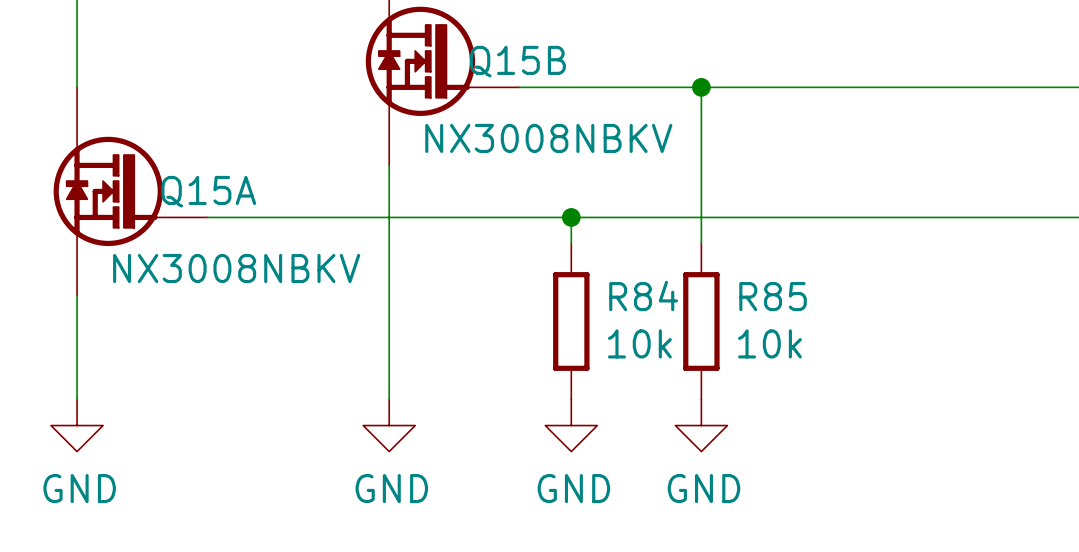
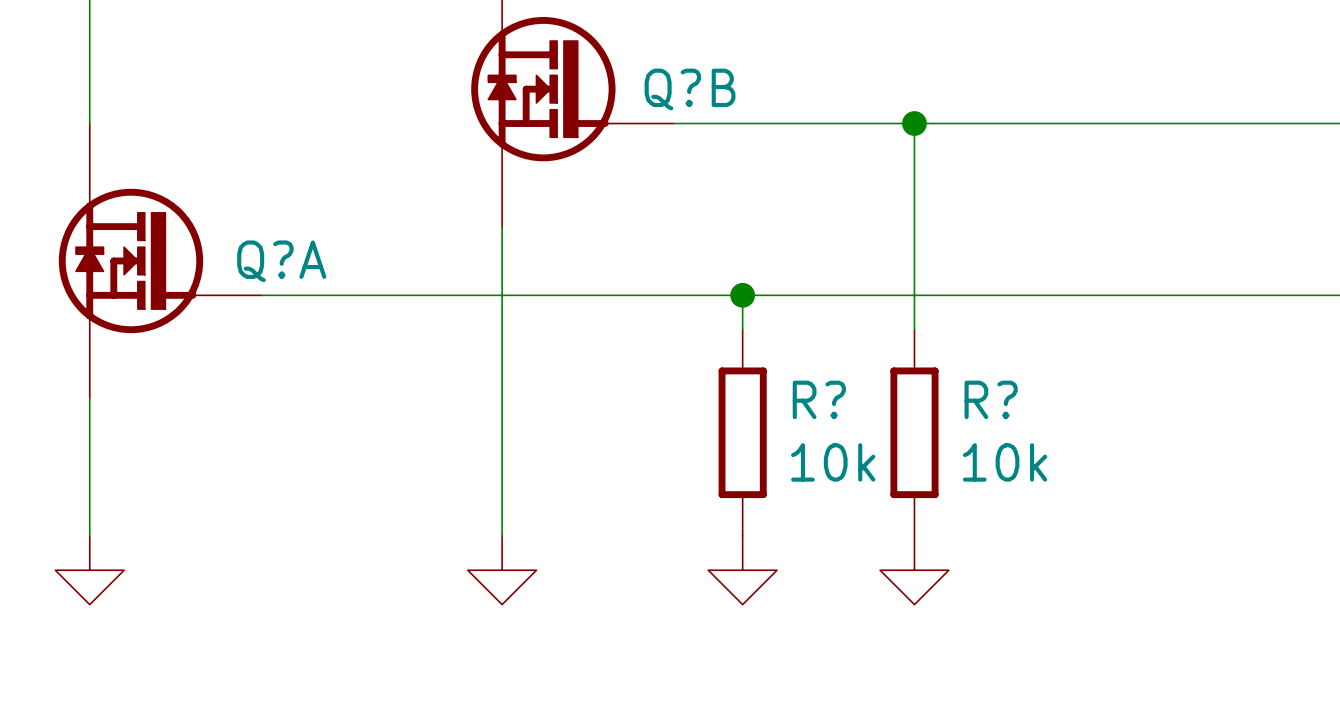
Q15B name: Q15B (517, 61) -> Q?B (690, 89)
Q15B value: NX3008NBKV (548, 138) -> none
Q15A name: Q15A (208, 191) -> Q?A (281, 261)
Q15A value: NX3008NBKV (236, 268) -> none
R84 name: R84 (643, 295) -> R? (819, 399)
R85 name: R85 (773, 296) -> R? (991, 399)
power symbol text: GND (79, 488) -> none
power symbol text: GND (391, 488) -> none
power symbol text: GND (573, 488) -> none
power symbol text: GND (703, 488) -> none

